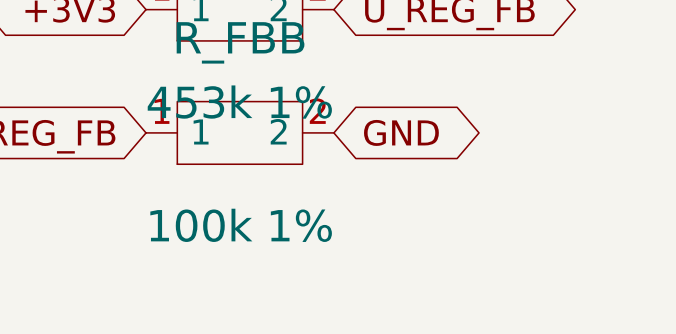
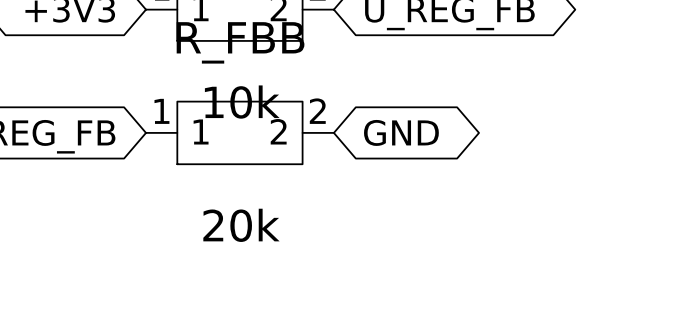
part value: 453k 1% (239, 102) -> 10k (242, 102)
R_FBB value: 100k 1% (241, 225) -> 20k (241, 225)

